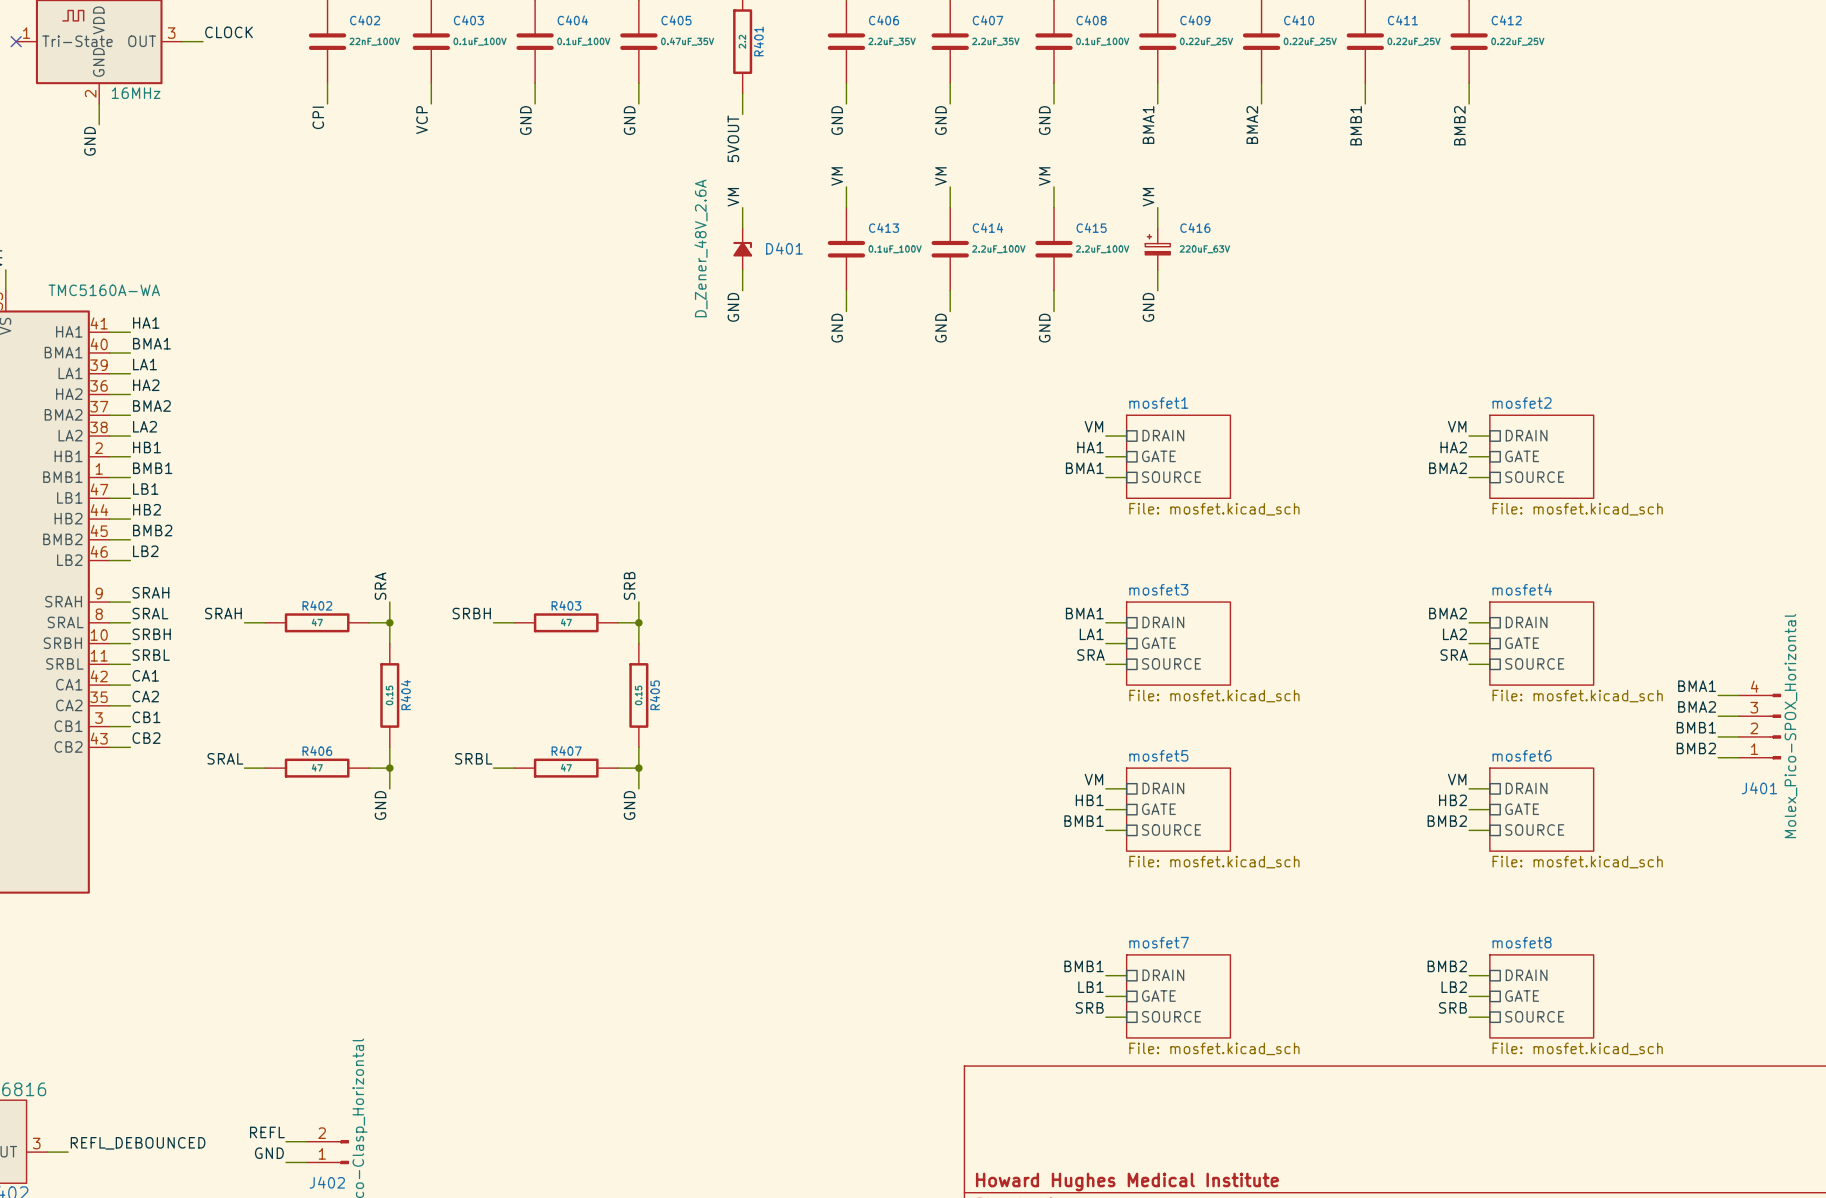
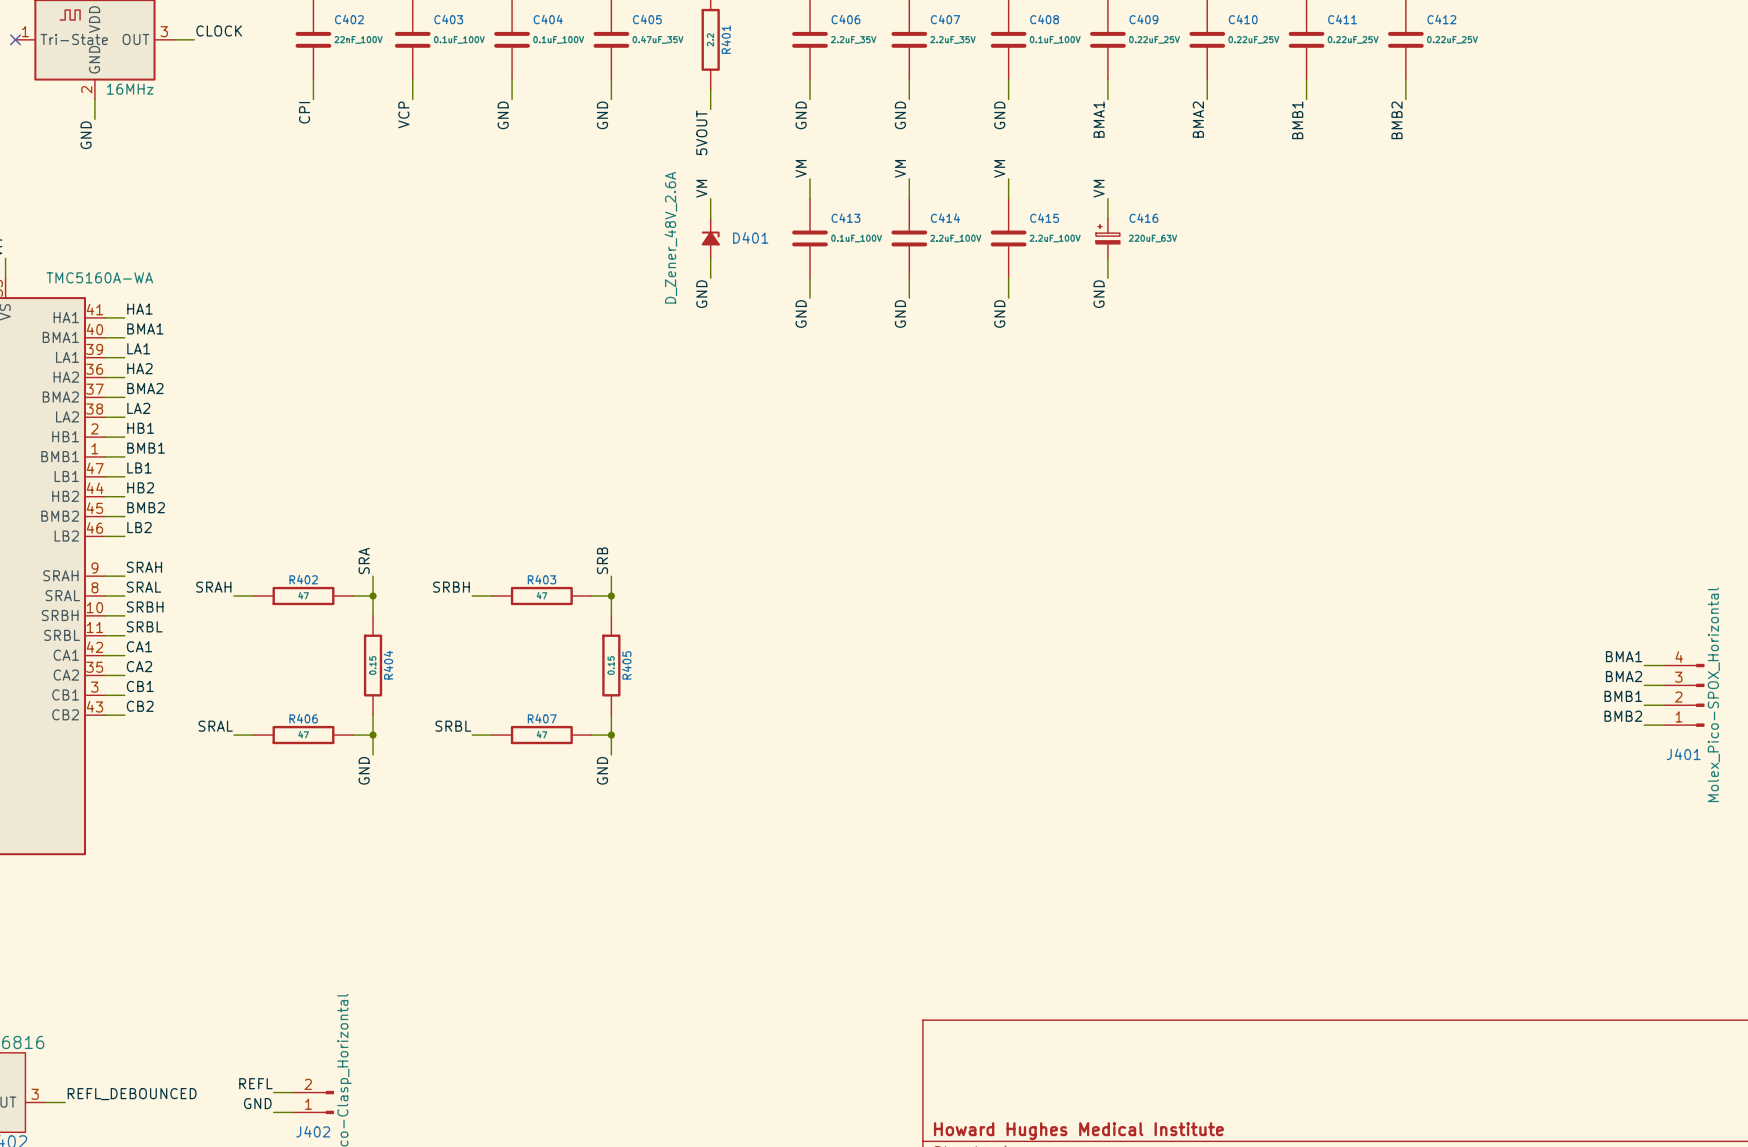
label: VM (1093, 426) -> none
label: VM (1457, 426) -> none
sheet pin: DRAIN (1163, 435) -> none
sheet pin: DRAIN (1526, 435) -> none
wire: (1105, 436) (1126, 436) -> none
wire: (1469, 436) (1489, 436) -> none
label: HA1 (1090, 447) -> none
label: HA2 (1453, 447) -> none
wire: (1105, 456) (1126, 456) -> none
sheet pin: GATE (1158, 456) -> none
sheet mosfet1: File: mosfet.kicad_sch (1178, 456) -> none
wire: (1469, 456) (1489, 456) -> none
sheet pin: GATE (1522, 456) -> none
sheet mosfet2: File: mosfet.kicad_sch (1541, 456) -> none
label: BMA1 (1084, 468) -> none
label: BMA2 (1448, 468) -> none
wire: (1105, 477) (1126, 477) -> none
sheet pin: SOURCE (1171, 477) -> none
wire: (1469, 477) (1489, 477) -> none
sheet pin: SOURCE (1534, 477) -> none
label: BMA1 (1084, 613) -> none
label: BMA2 (1448, 613) -> none
wire: (1105, 622) (1126, 622) -> none
sheet pin: DRAIN (1163, 622) -> none
wire: (1469, 622) (1489, 622) -> none
sheet pin: DRAIN (1526, 622) -> none
label: LA1 (1091, 634) -> none
label: LA2 (1454, 634) -> none
wire: (1105, 643) (1126, 643) -> none
sheet pin: GATE (1158, 643) -> none
sheet mosfet3: File: mosfet.kicad_sch (1178, 643) -> none
wire: (1469, 643) (1489, 643) -> none
sheet pin: GATE (1522, 643) -> none
sheet mosfet4: File: mosfet.kicad_sch (1541, 643) -> none
label: SRA (1090, 655) -> none
label: SRA (1454, 655) -> none
sheet pin: SOURCE (1171, 663) -> none
sheet pin: SOURCE (1534, 663) -> none
wire: (1105, 664) (1126, 664) -> none
wire: (1469, 664) (1489, 664) -> none
label: VM (1093, 779) -> none
label: VM (1457, 779) -> none
wire: (1105, 788) (1126, 788) -> none
sheet pin: DRAIN (1163, 788) -> none
wire: (1469, 788) (1489, 788) -> none
sheet pin: DRAIN (1526, 788) -> none
label: HB1 (1089, 800) -> none
label: HB2 (1452, 800) -> none
wire: (1105, 809) (1126, 809) -> none
sheet pin: GATE (1158, 809) -> none
sheet mosfet5: File: mosfet.kicad_sch (1178, 809) -> none
wire: (1469, 809) (1489, 809) -> none
sheet pin: GATE (1522, 809) -> none
sheet mosfet6: File: mosfet.kicad_sch (1541, 809) -> none
label: BMB1 (1084, 821) -> none
label: BMB2 (1447, 821) -> none
sheet pin: SOURCE (1171, 829) -> none
sheet pin: SOURCE (1534, 829) -> none
wire: (1105, 830) (1126, 830) -> none
wire: (1469, 830) (1489, 830) -> none
label: BMB1 (1084, 966) -> none
label: BMB2 (1447, 966) -> none
wire: (1105, 975) (1126, 975) -> none
sheet pin: DRAIN (1163, 975) -> none
wire: (1469, 975) (1489, 975) -> none
sheet pin: DRAIN (1526, 975) -> none
label: LB1 (1090, 987) -> none
label: LB2 (1454, 987) -> none
wire: (1105, 996) (1126, 996) -> none
sheet pin: GATE (1158, 996) -> none
sheet mosfet7: File: mosfet.kicad_sch (1178, 996) -> none
wire: (1469, 996) (1489, 996) -> none
sheet pin: GATE (1522, 996) -> none
sheet mosfet8: File: mosfet.kicad_sch (1541, 996) -> none
label: SRB (1089, 1007) -> none
label: SRB (1452, 1007) -> none
sheet pin: SOURCE (1171, 1016) -> none
sheet pin: SOURCE (1534, 1016) -> none
wire: (1105, 1017) (1126, 1017) -> none
wire: (1469, 1017) (1489, 1017) -> none

